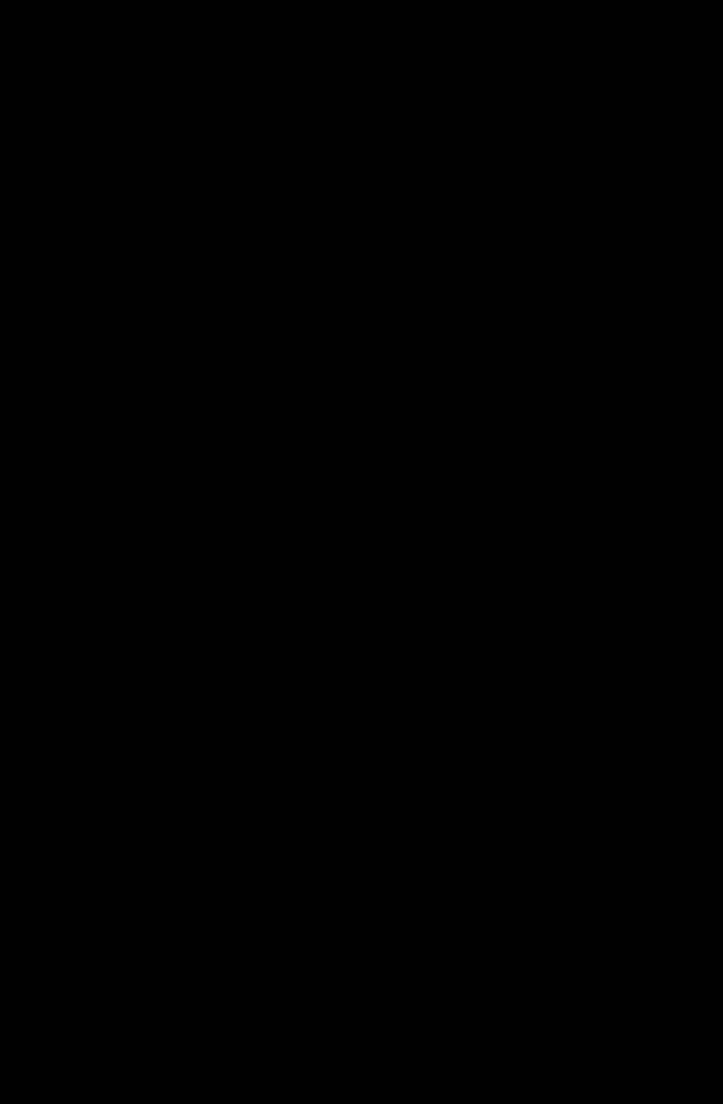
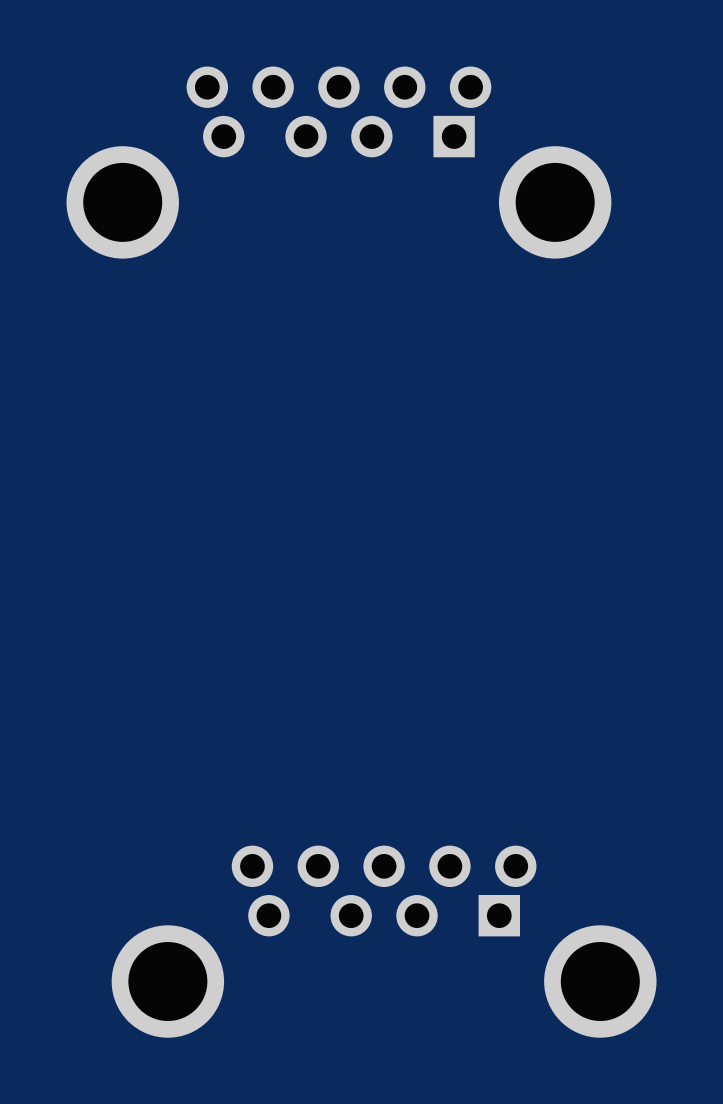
part: none -> (338, 162)
part: none -> (384, 941)

